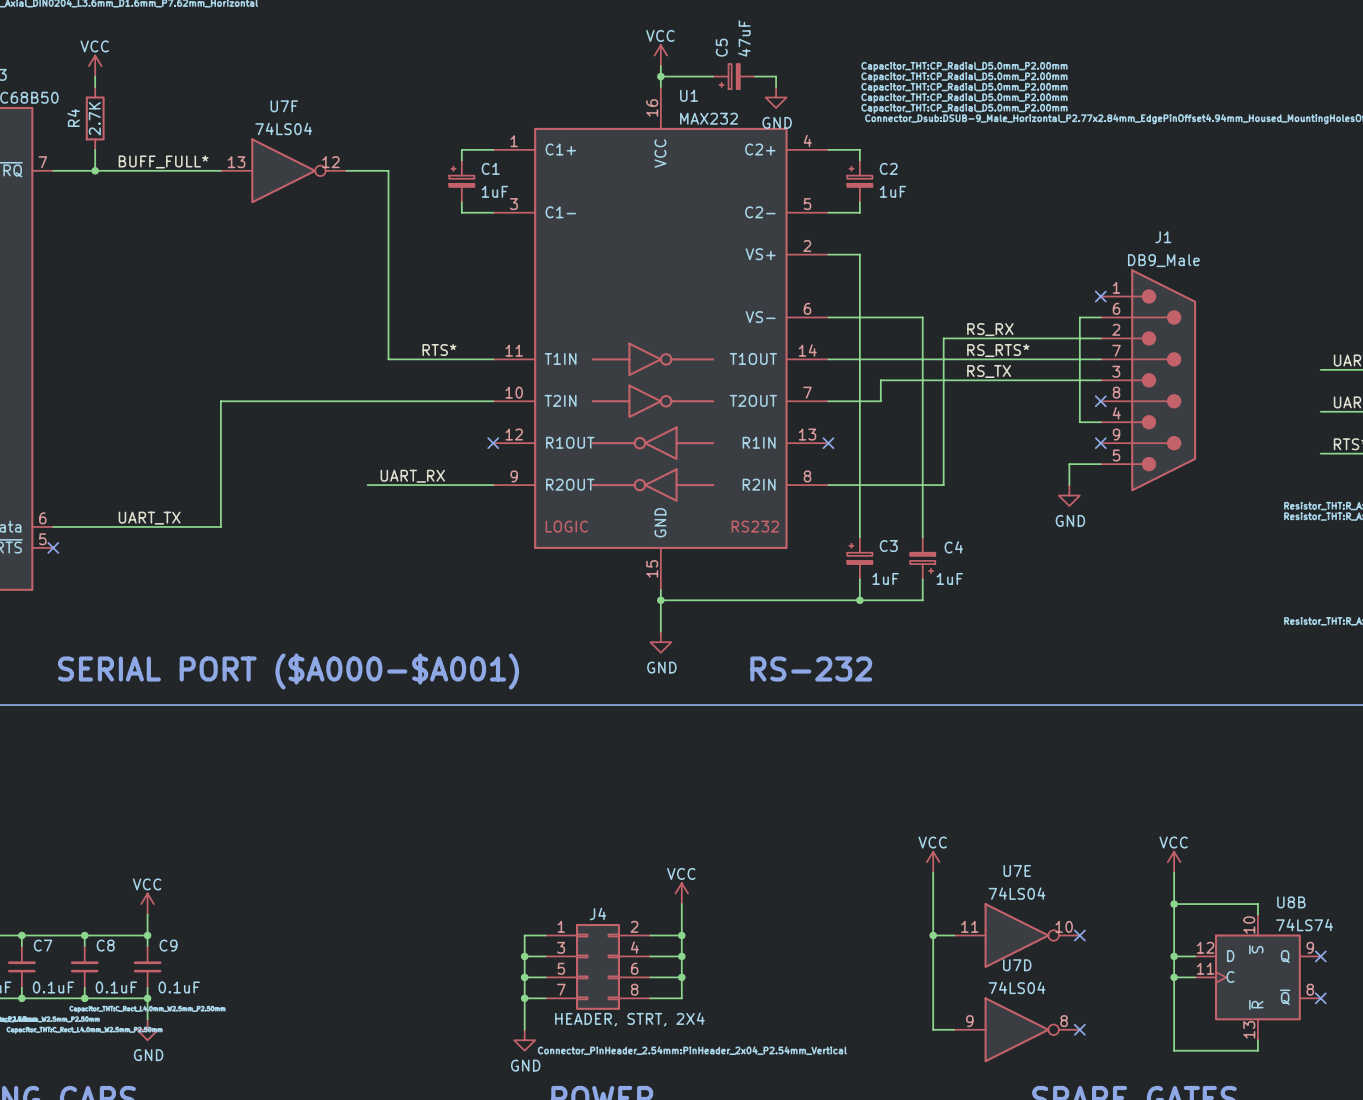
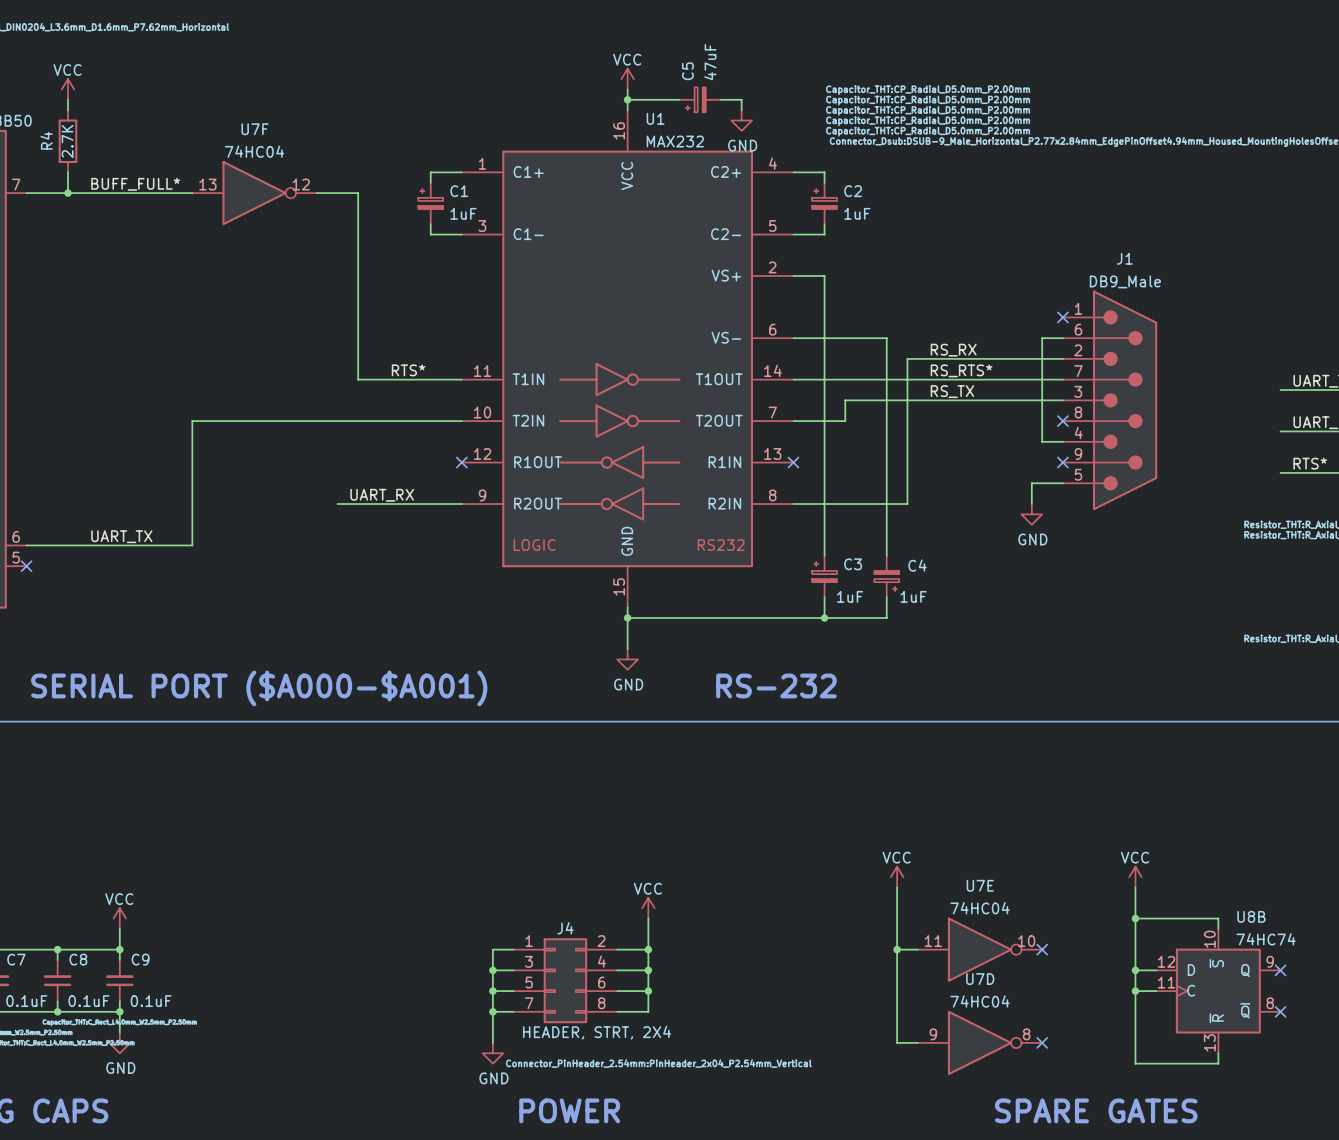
U7F value: 74LS04 (283, 128) -> 74HC04 (254, 151)
U7E value: 74LS04 (1017, 893) -> 74HC04 (980, 908)
U8B value: 74LS74 (1304, 925) -> 74HC74 (1266, 939)
U7D value: 74LS04 (1017, 987) -> 74HC04 (980, 1001)

